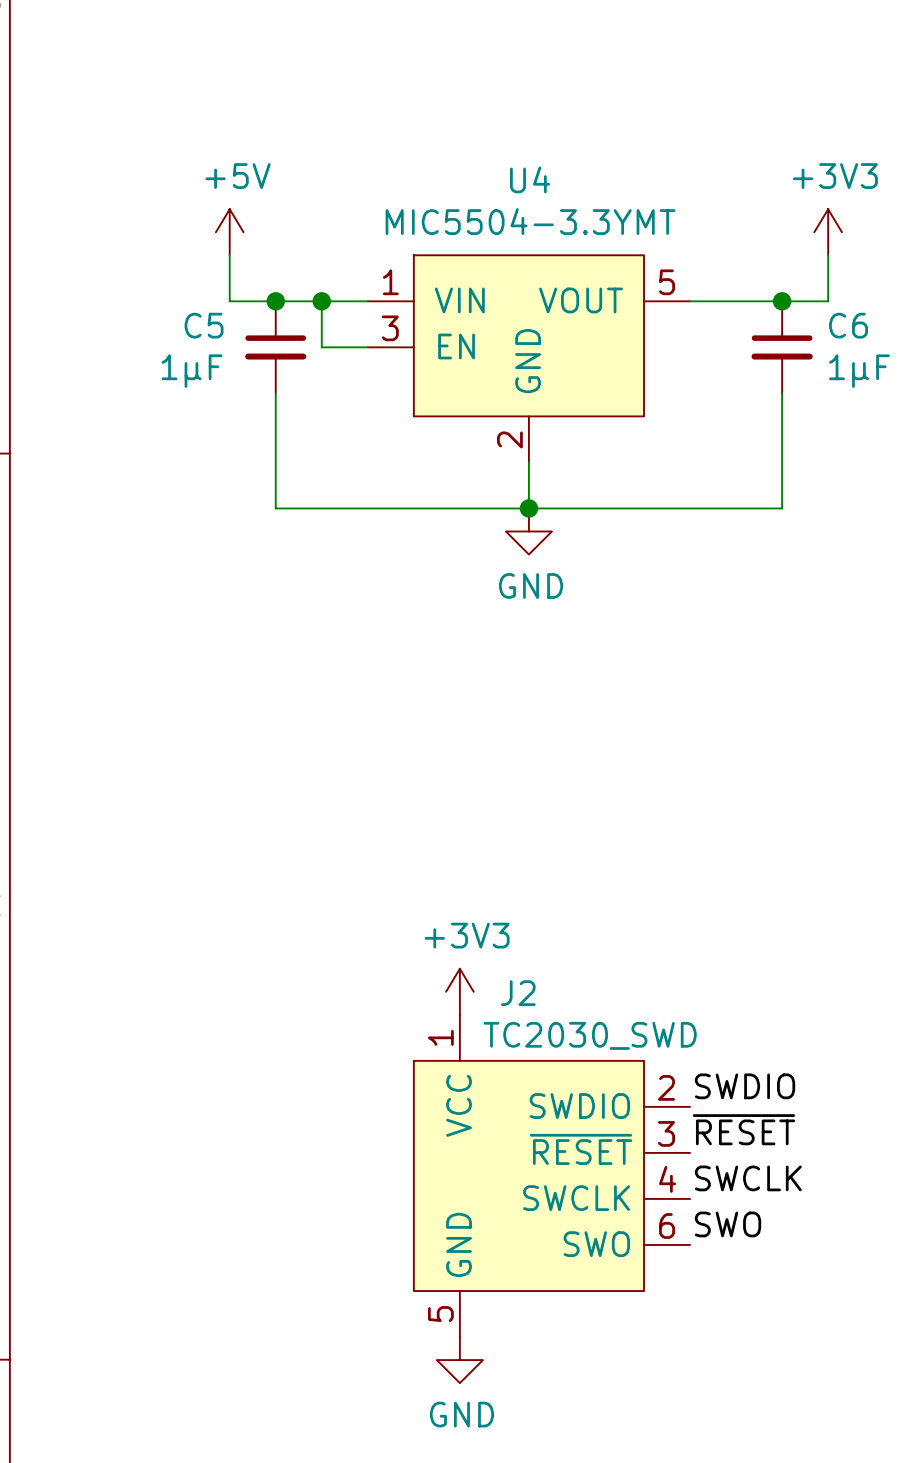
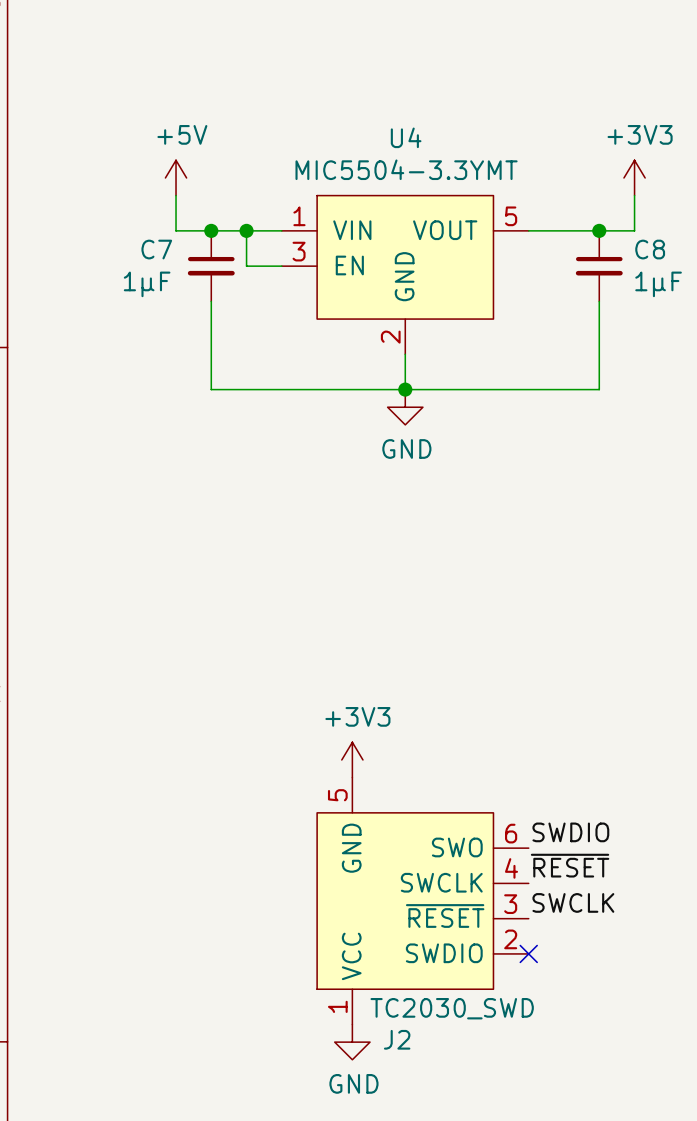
C5 name: C5 (204, 325) -> C7 (156, 249)
C6 name: C6 (848, 325) -> C8 (650, 249)
J2 flip: as is (528, 1175) -> up-down (405, 901)
label: SWO (728, 1224) -> none
no-connect mark: none -> (528, 953)

